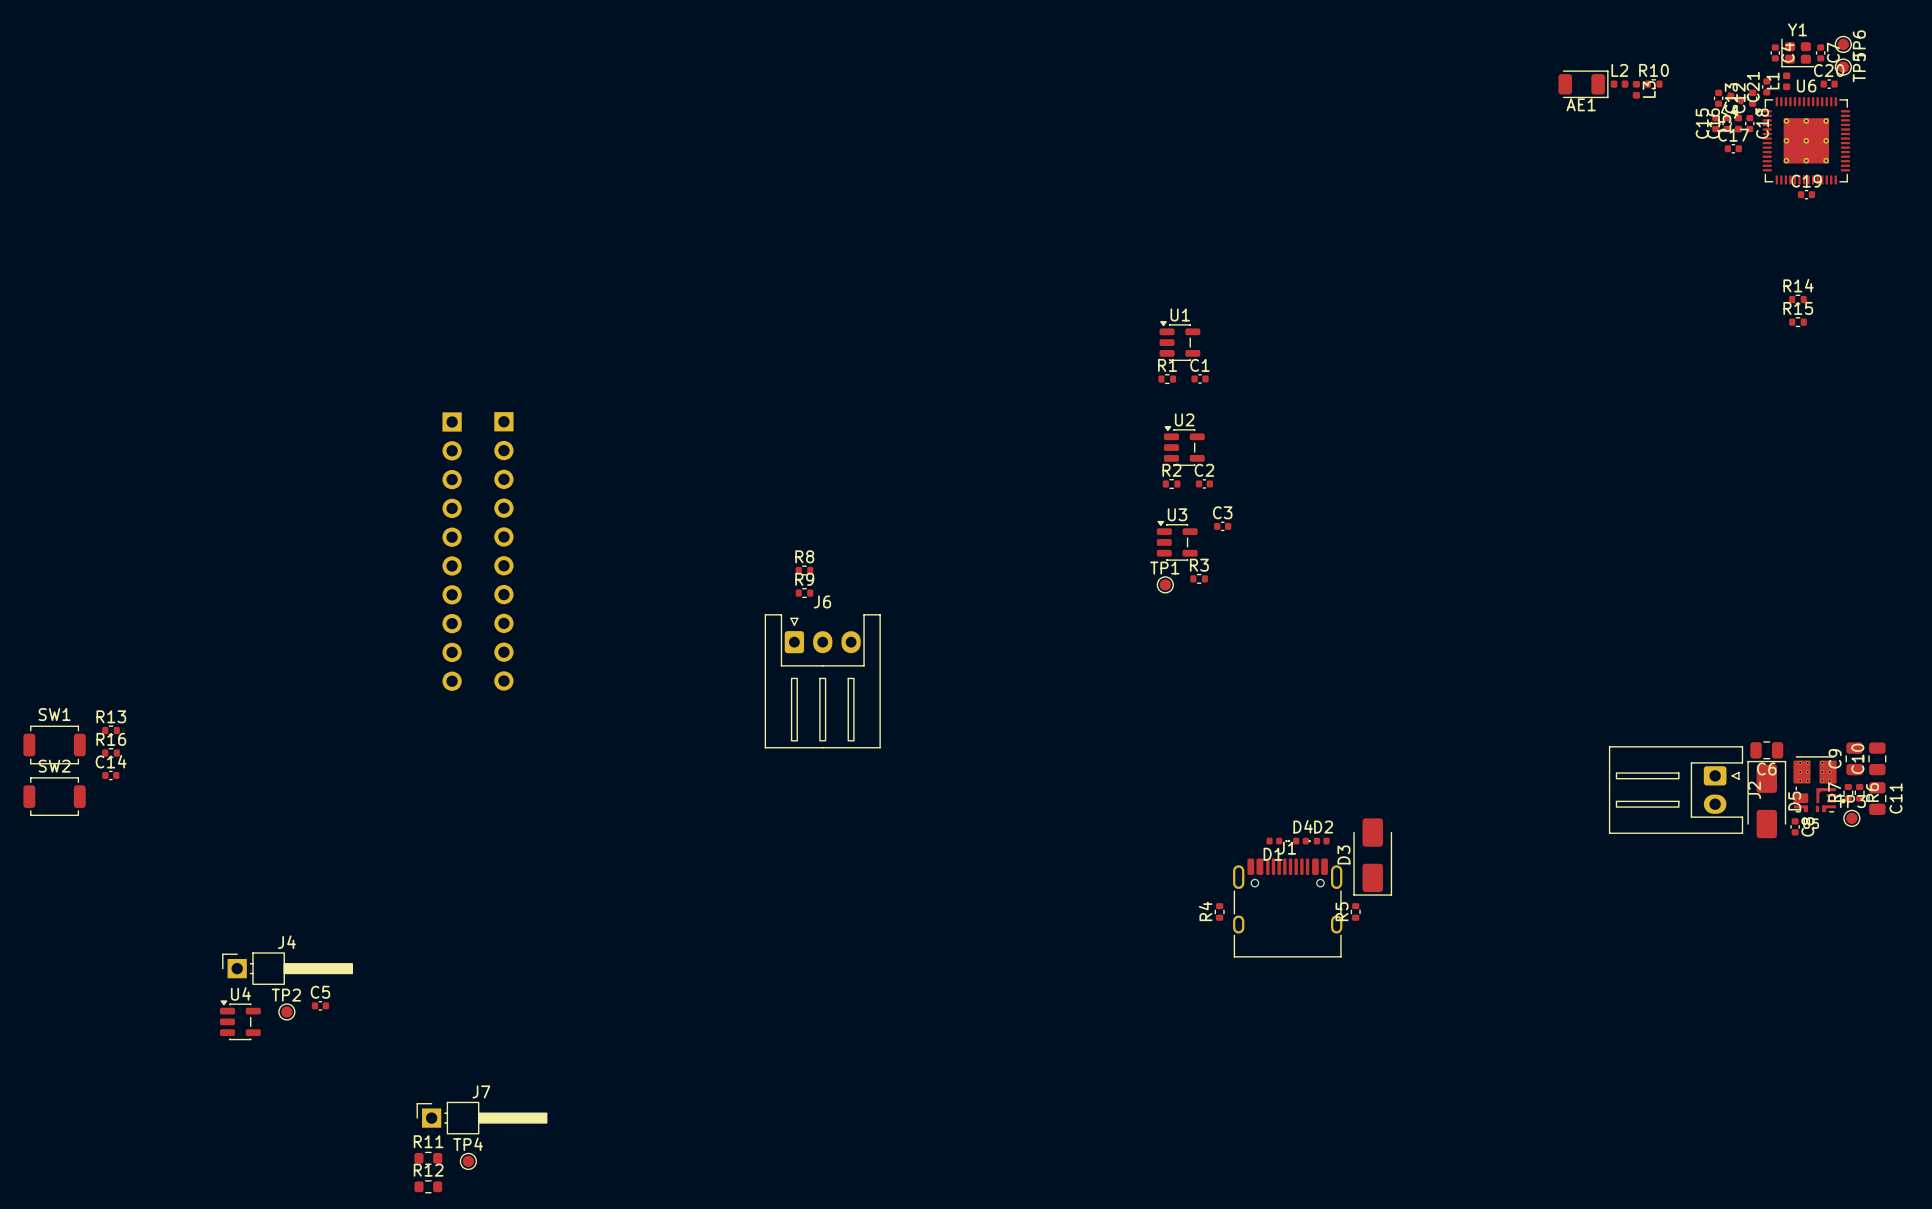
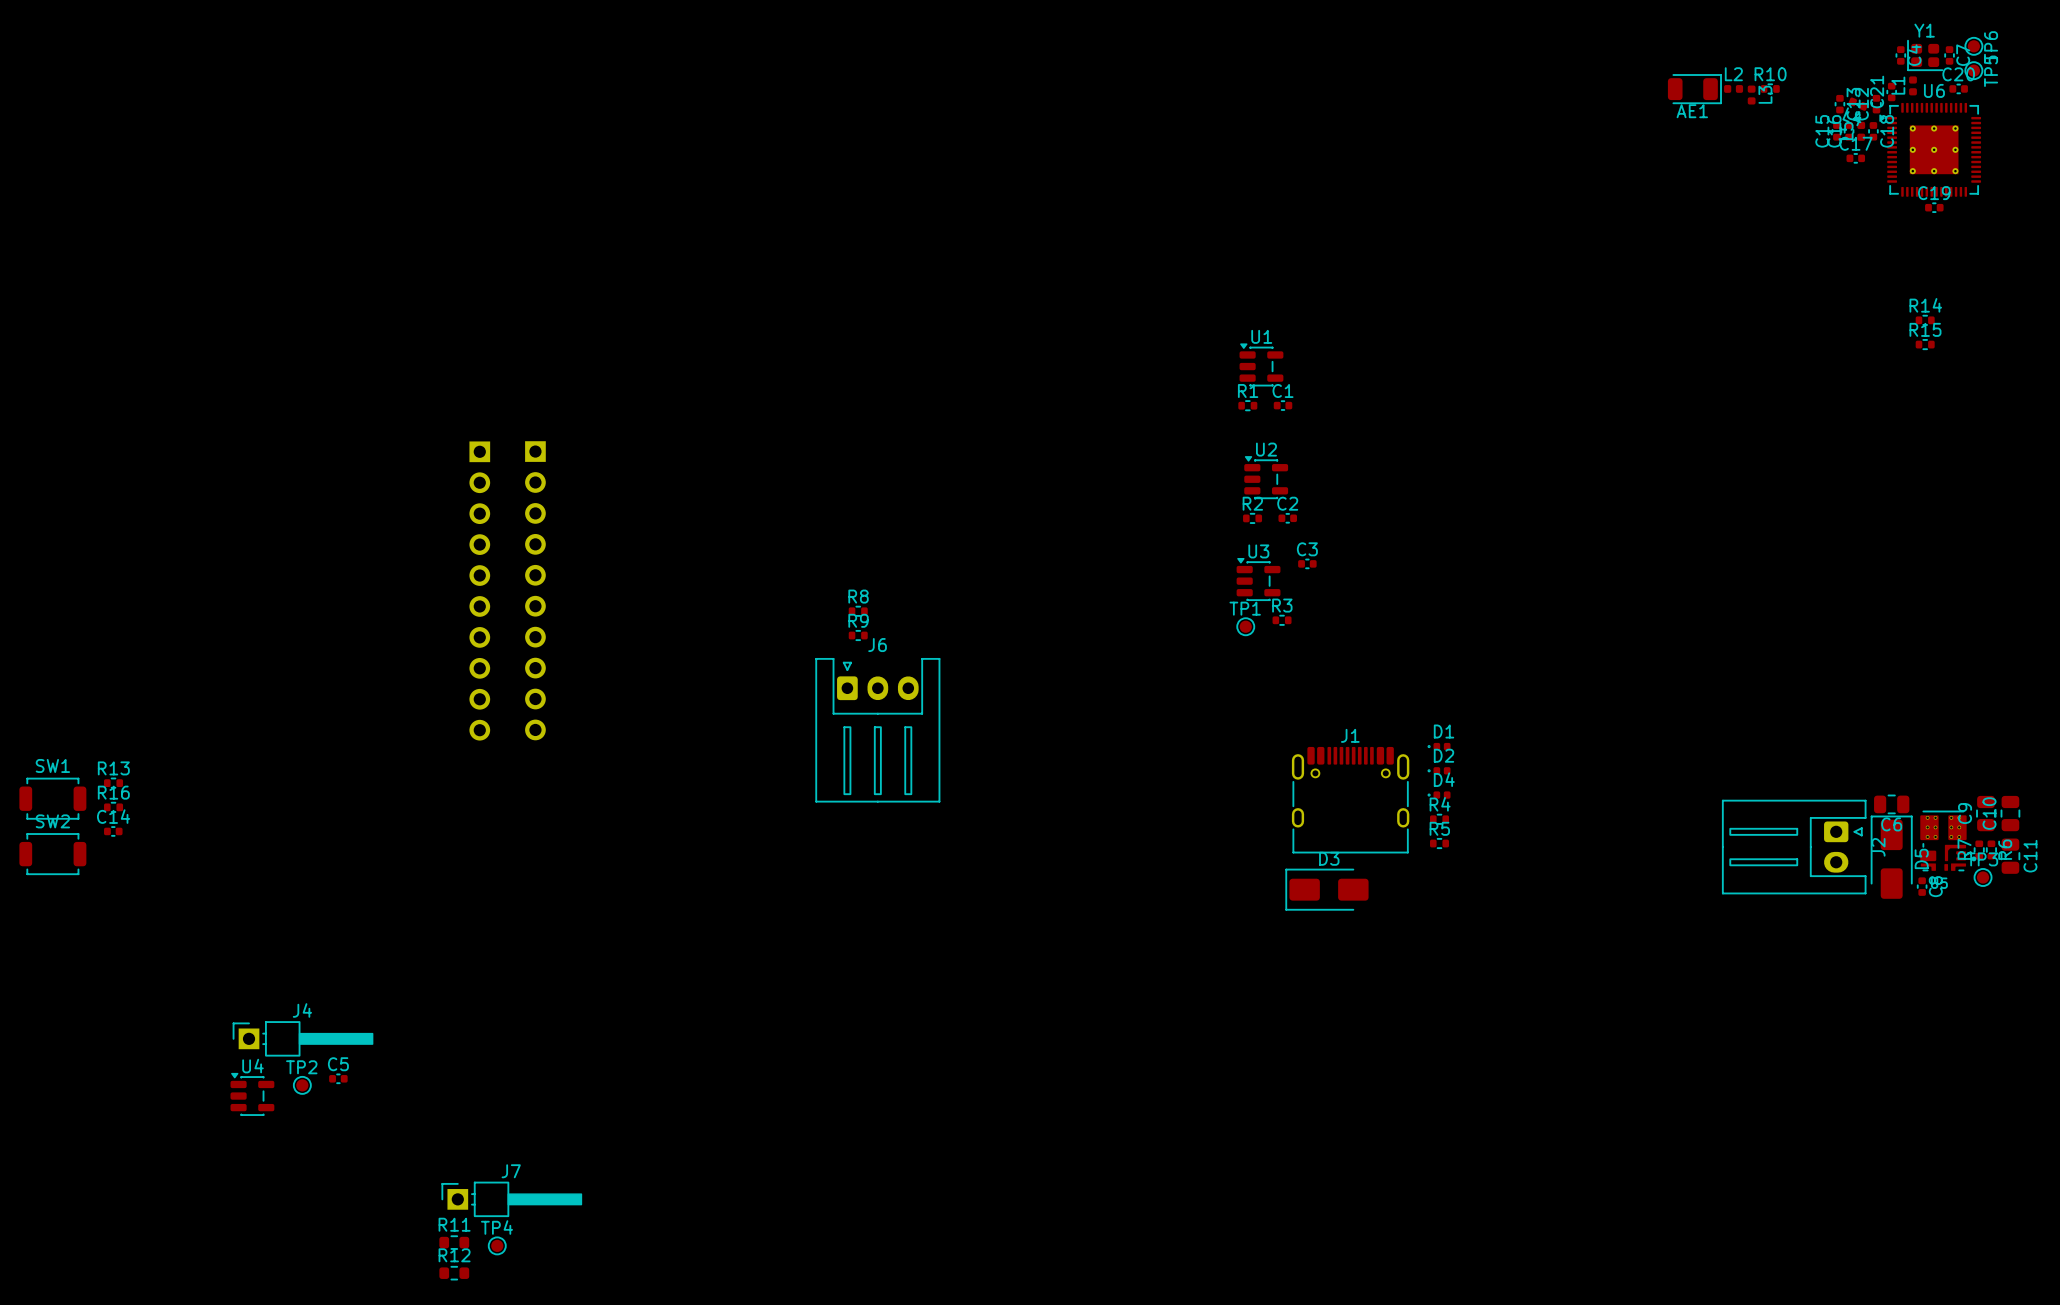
D1 rotation: 0° (1276, 841) -> 180° (1439, 746)
D1 position: (1276, 841) -> (1439, 746)
D4 position: (1298, 841) -> (1439, 795)
D2 position: (1319, 841) -> (1439, 770)
D3 rotation: 0° (1372, 857) -> 90° clockwise (1327, 889)
D3 position: (1372, 857) -> (1327, 889)
J1 position: (1287, 908) -> (1350, 800)
R4 rotation: 0° (1219, 911) -> 90° clockwise (1439, 819)
R4 position: (1219, 911) -> (1439, 819)
R5 rotation: 0° (1355, 911) -> 90° clockwise (1439, 843)
R5 position: (1355, 911) -> (1439, 843)

